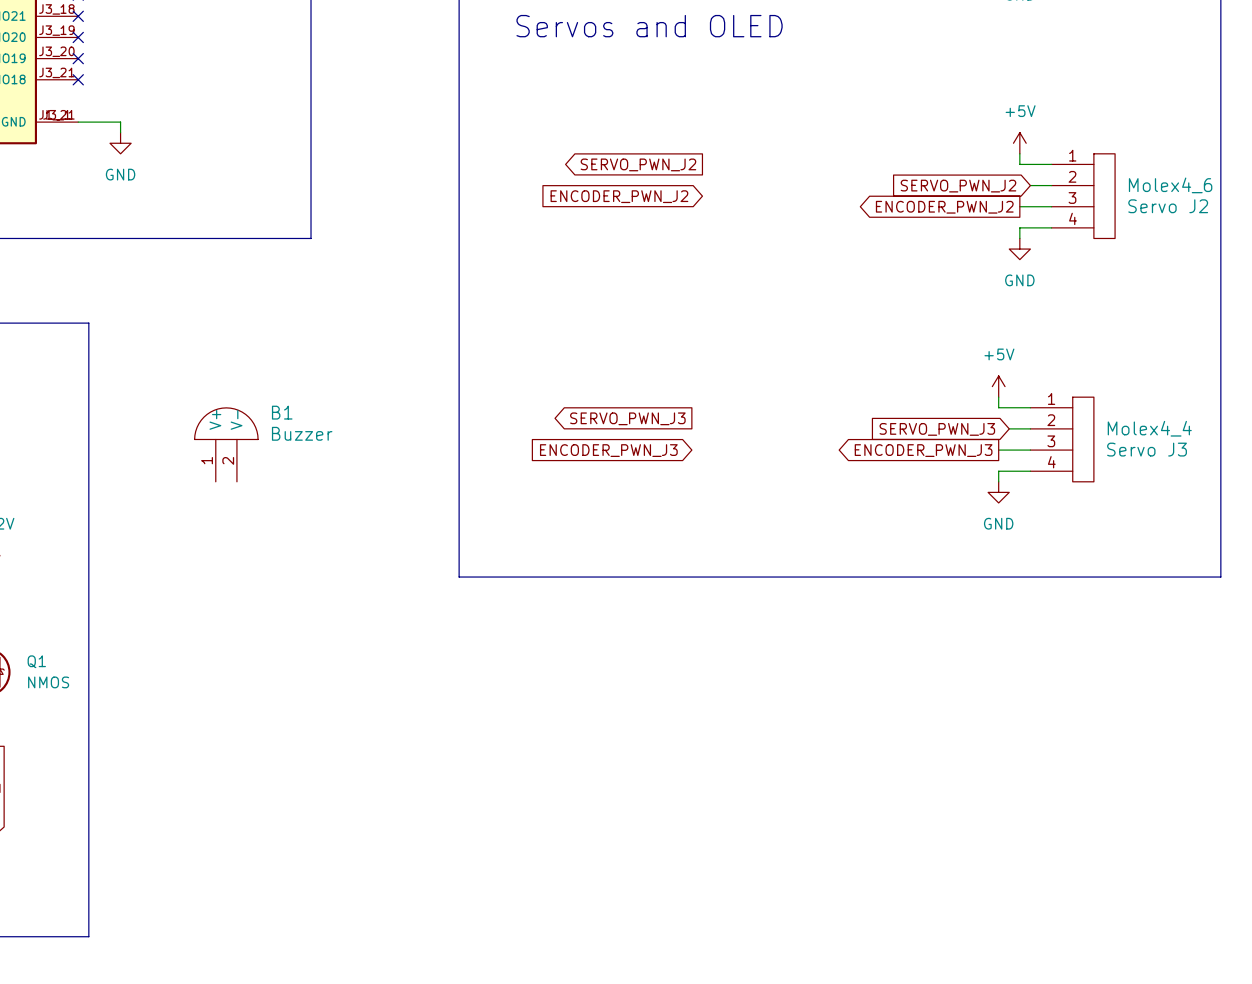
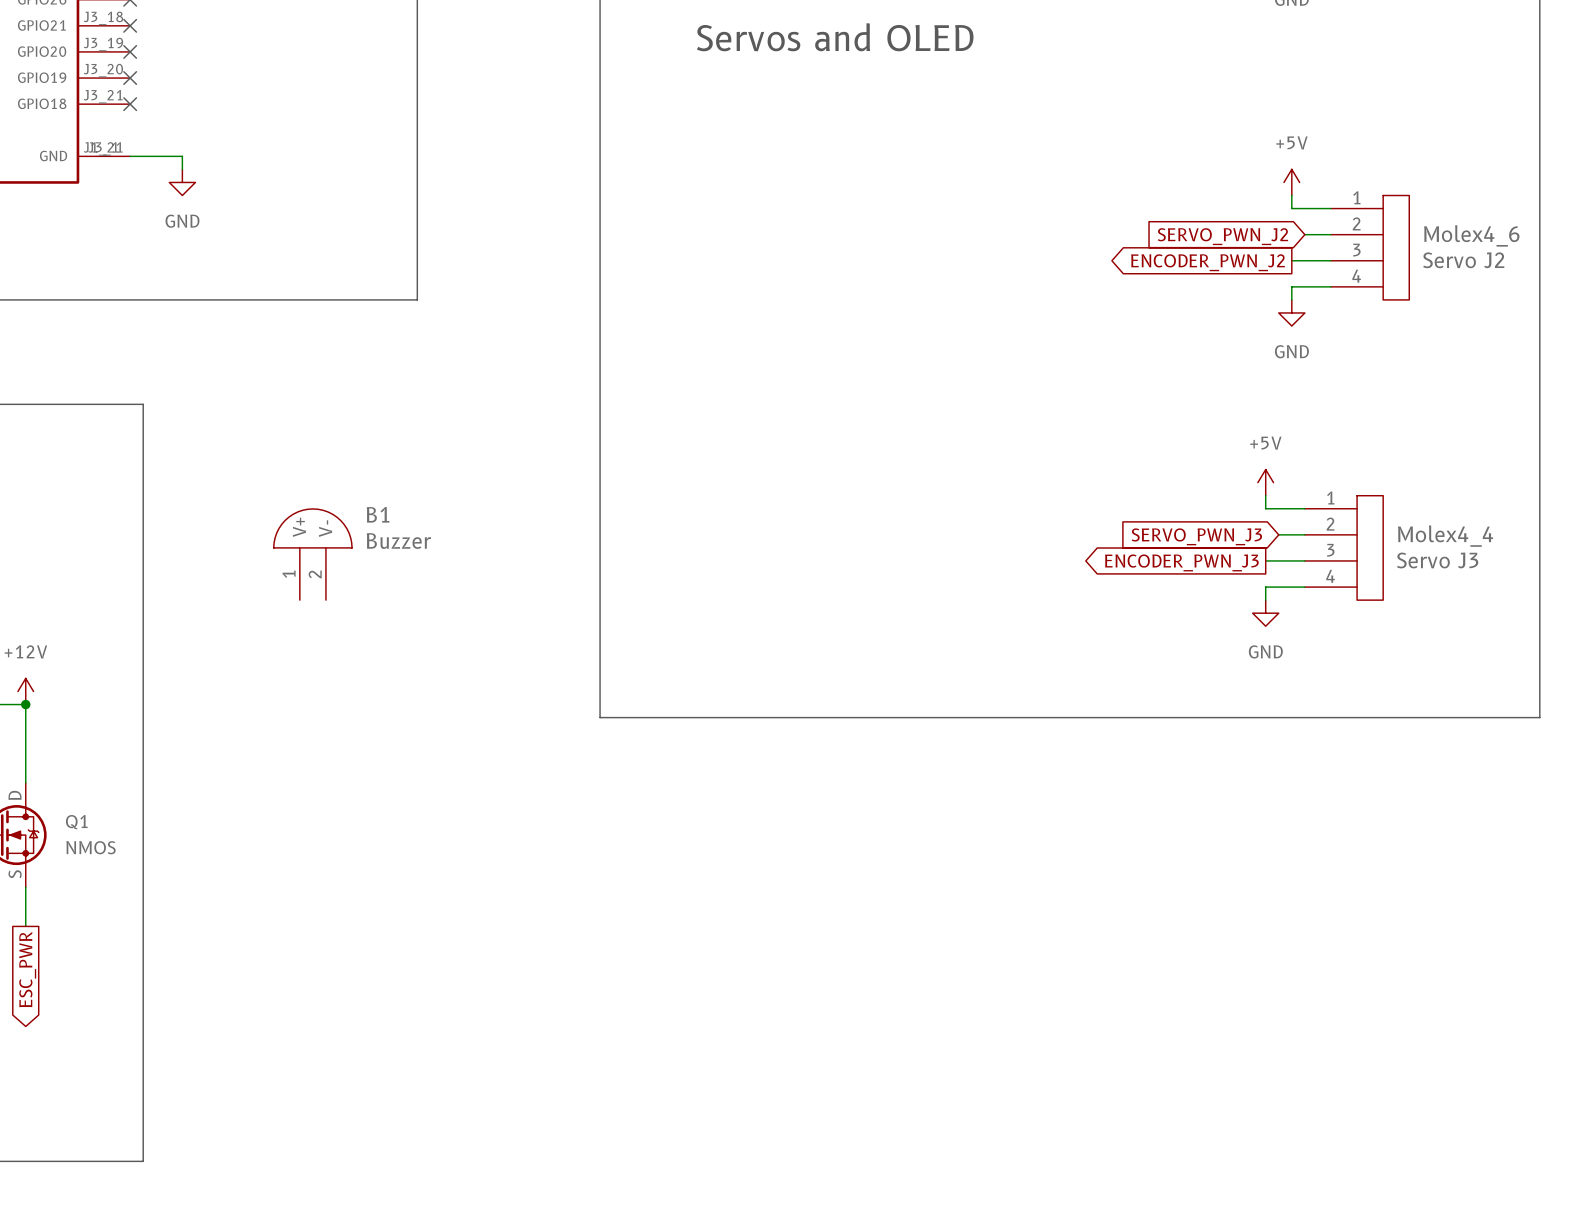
global label: SERVO_PWN_J2 (638, 164) -> none
global label: ENCODER_PWN_J2 (619, 196) -> none
global label: SERVO_PWN_J3 (627, 418) -> none
global label: ENCODER_PWN_J3 (608, 450) -> none

